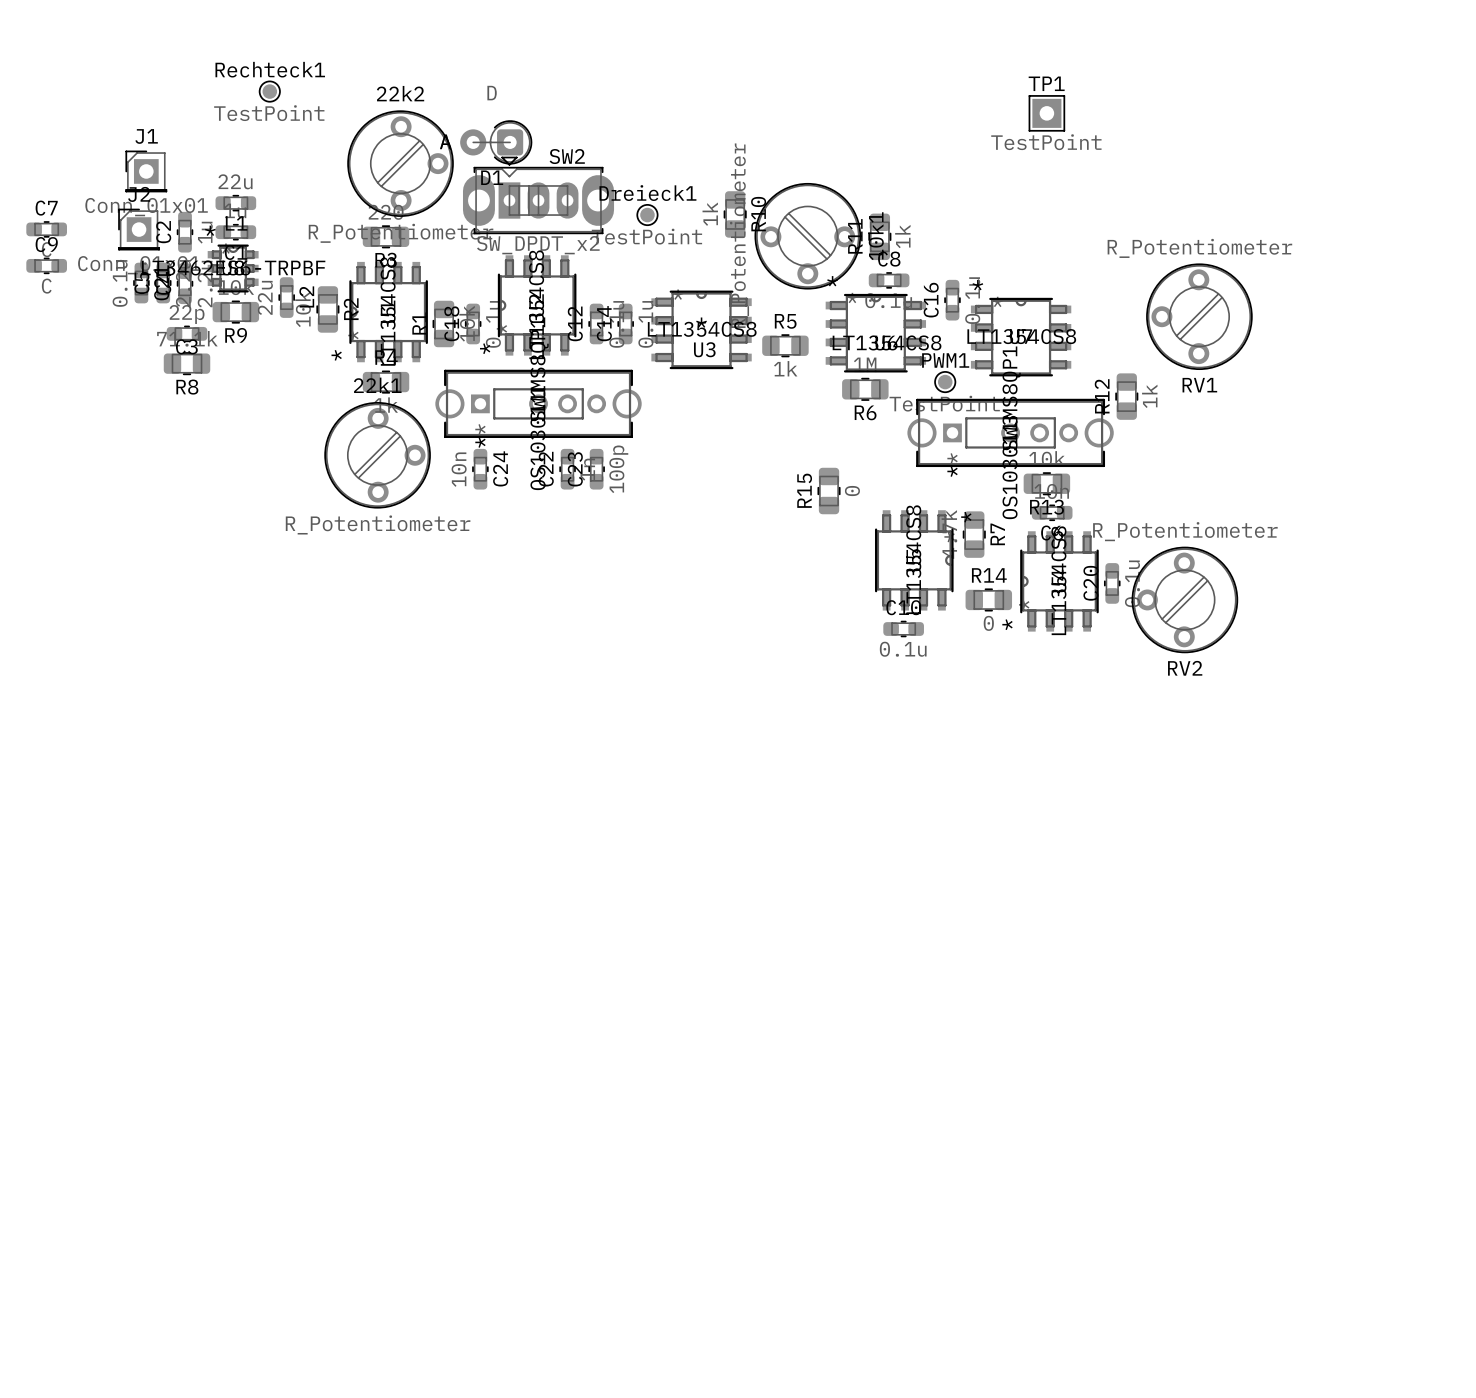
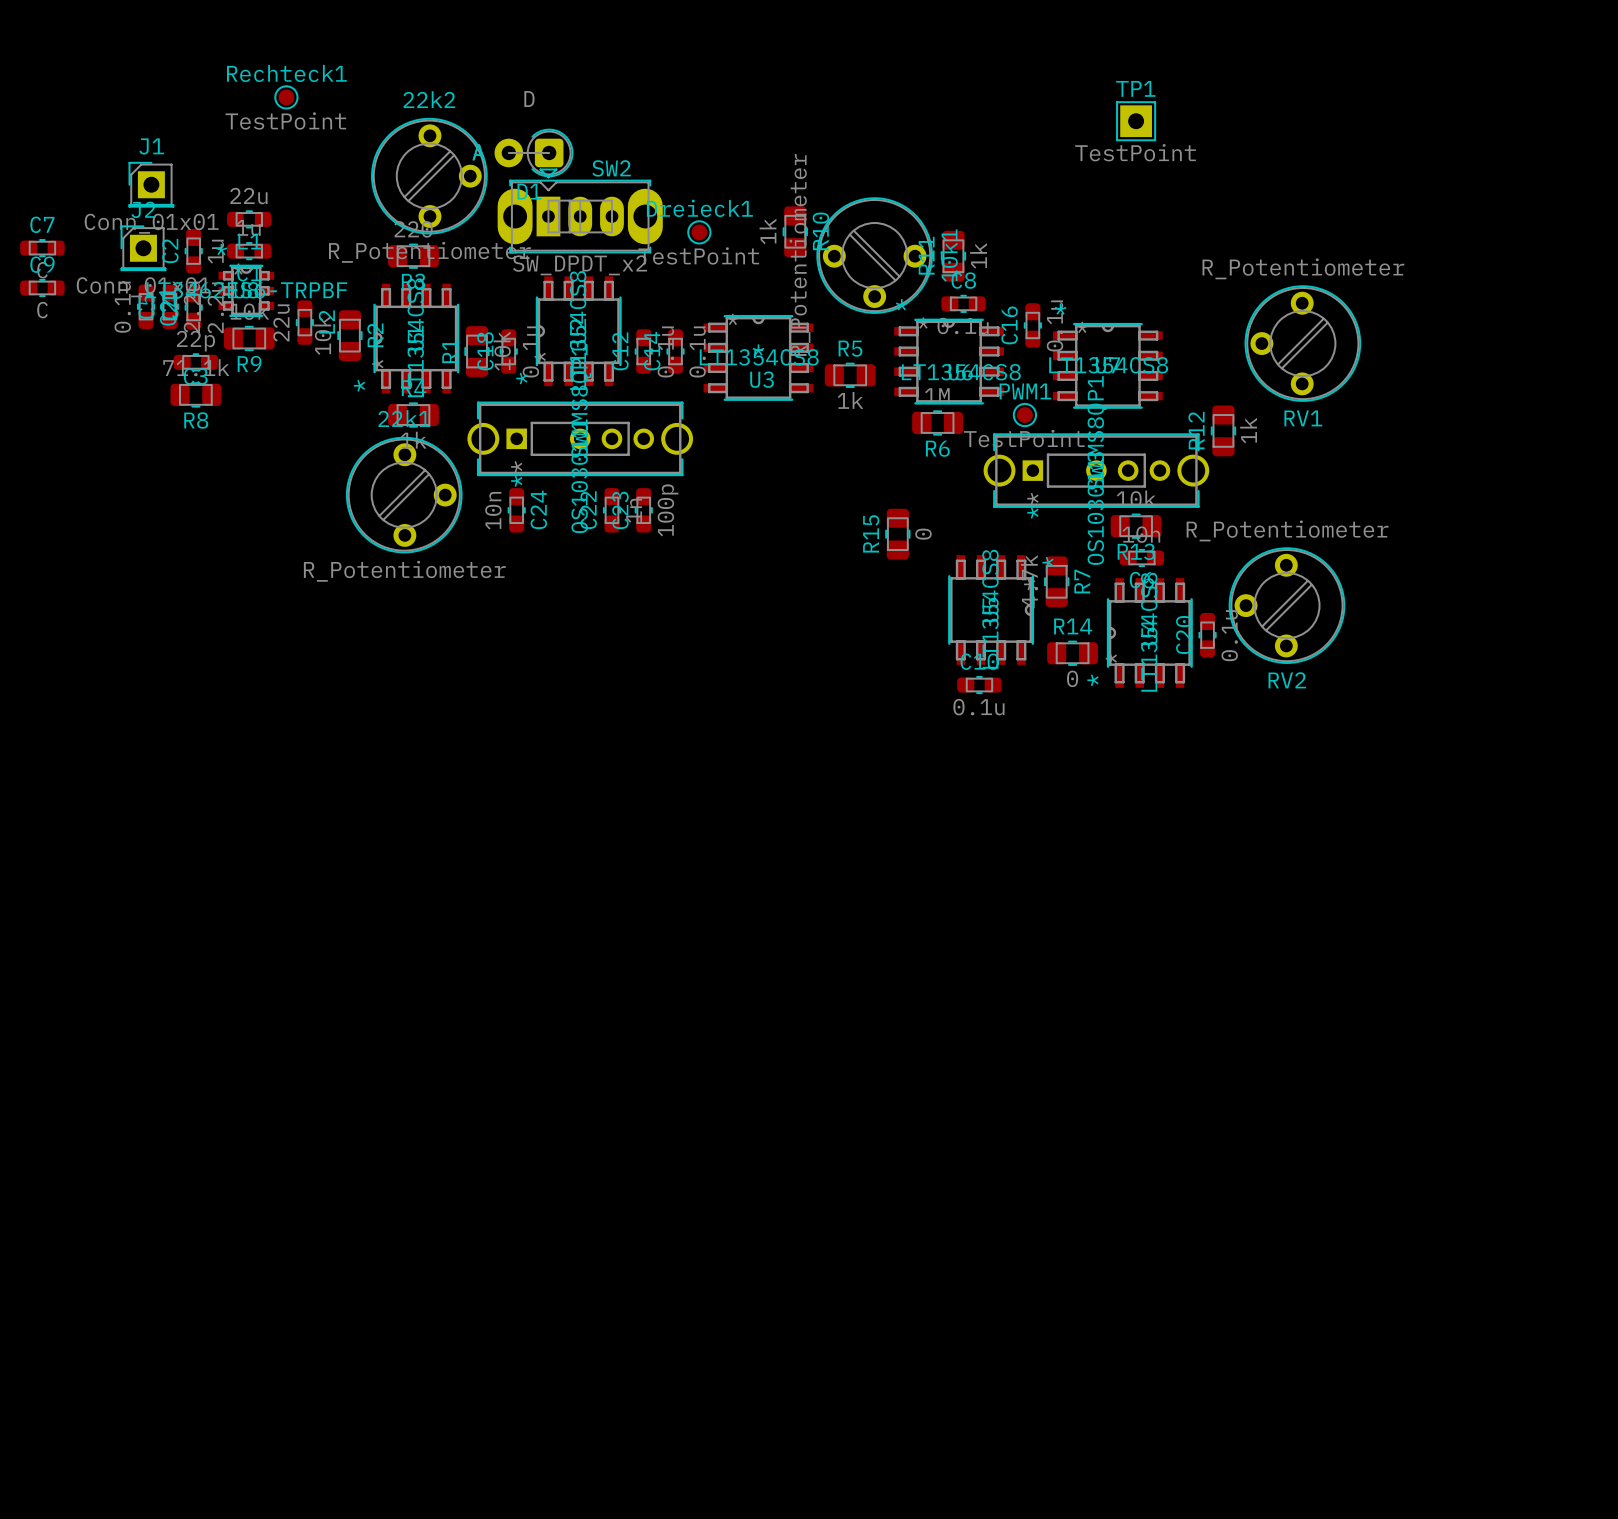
RV2 position: (1184, 599) -> (1286, 605)

